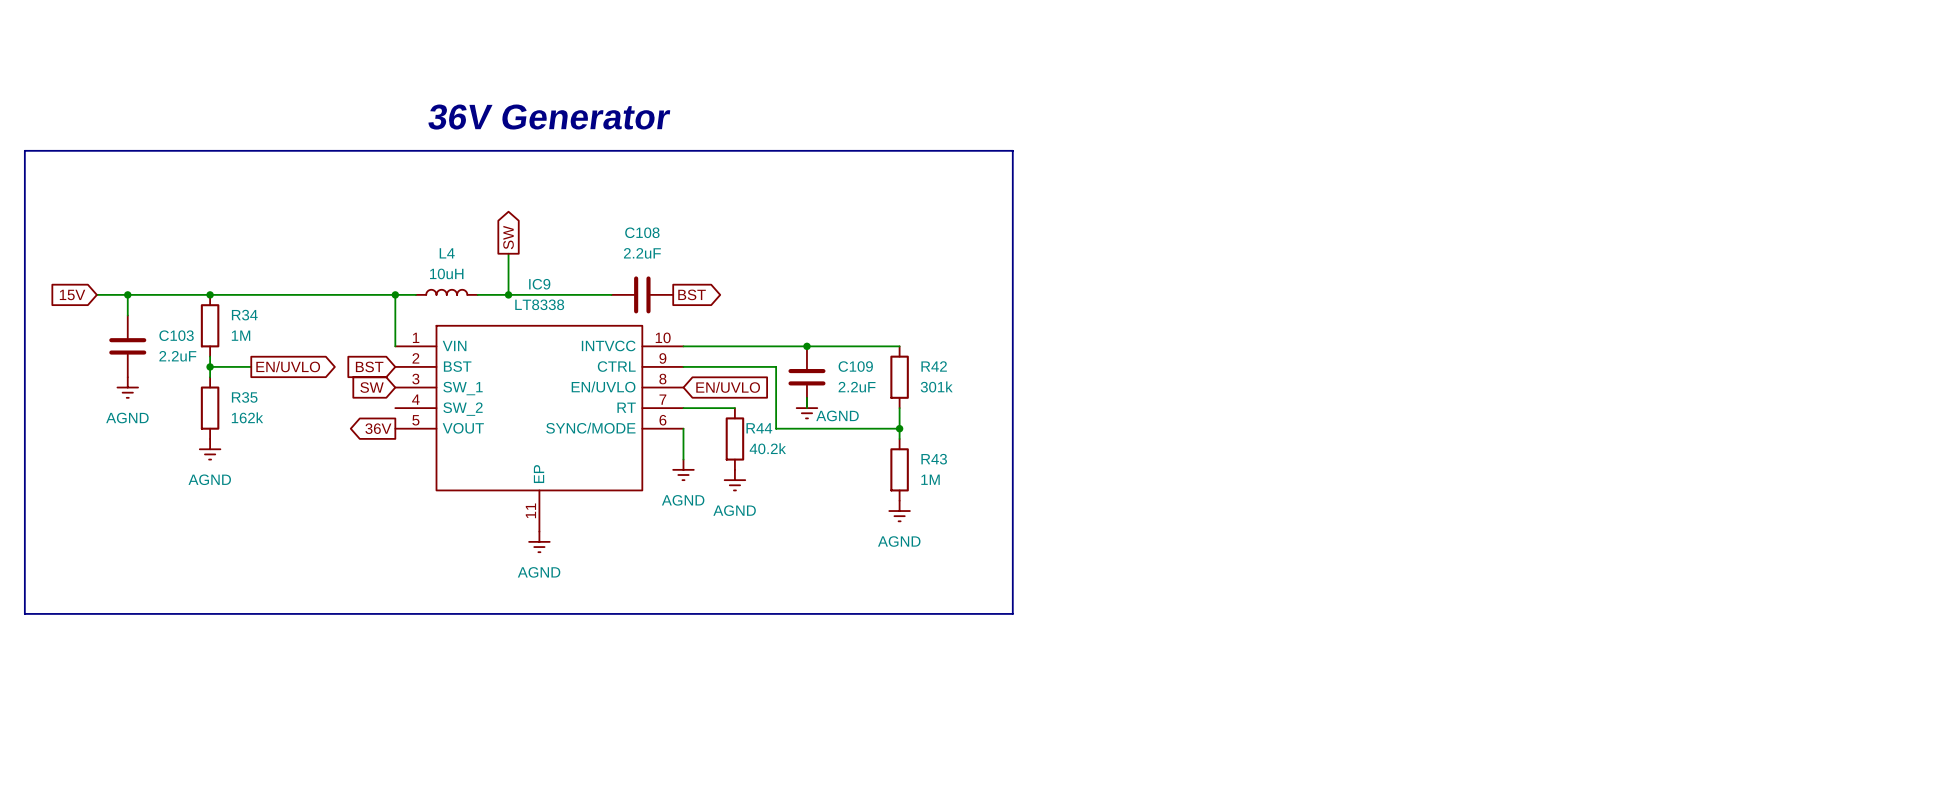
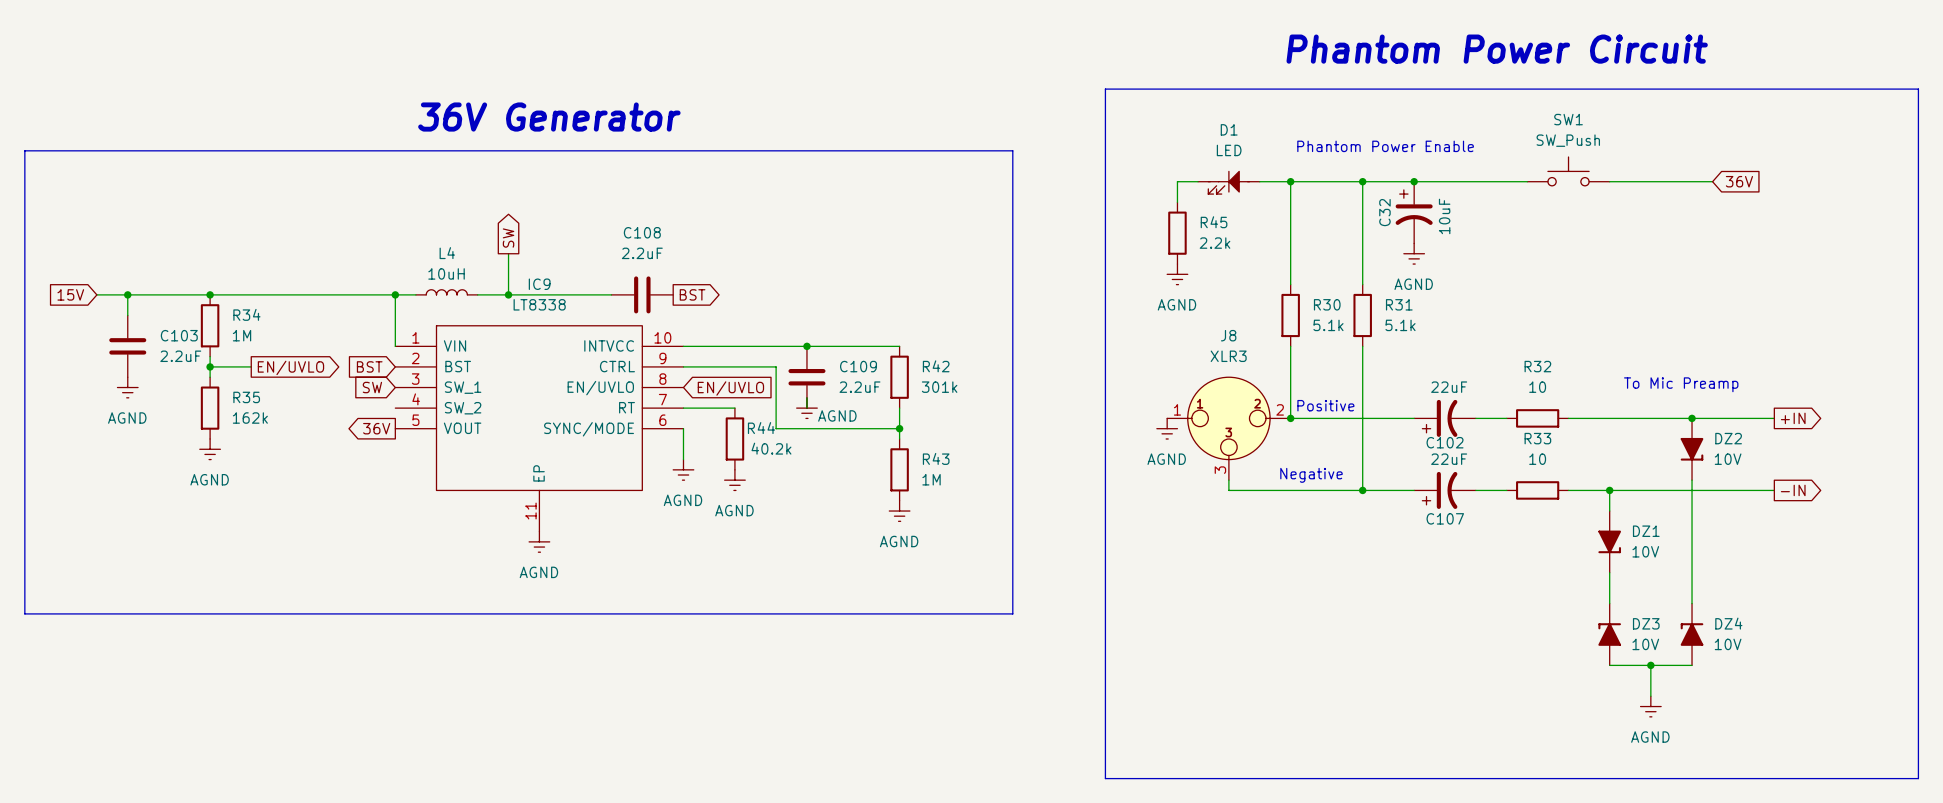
text: none -> Phantom Power Circuit (1497, 49)
line: none -> (1105, 89) (1918, 89) (1918, 778) (1105, 778) (1105, 89)
text: none -> Phantom Power Enable (1385, 146)
SW1: none -> SW_Push (1568, 171)
wire: none -> (1198, 181) (1177, 181) (1177, 202)
wire: none -> (1259, 181) (1527, 181)
wire: none -> (1290, 181) (1290, 284)
junction: none -> (1290, 181)
wire: none -> (1362, 181) (1362, 284)
junction: none -> (1362, 181)
junction: none -> (1414, 181)
wire: none -> (1609, 181) (1712, 181)
global label: none -> 36V (1739, 181)
D1: none -> LED (1228, 182)
C32: none -> 10uF (1414, 212)
R45: none -> 2.2k (1177, 233)
power symbol: none -> AGND (1414, 253)
power symbol: none -> AGND (1177, 274)
R30: none -> 5.1k (1290, 315)
R31: none -> 5.1k (1362, 315)
wire: none -> (1290, 346) (1290, 418) (1414, 418)
wire: none -> (1362, 346) (1362, 490)
text: none -> To Mic Preamp (1681, 384)
text: none -> Positive (1325, 405)
junction: none -> (1290, 418)
C102: none -> 22uF (1445, 418)
wire: none -> (1475, 418) (1506, 418)
R32: none -> 10 (1537, 418)
wire: none -> (1568, 418) (1774, 418)
junction: none -> (1692, 418)
global label: none -> +IN (1793, 418)
power symbol: none -> AGND (1167, 428)
J8: none -> XLR3 (1228, 428)
DZ2: none -> 10V (1692, 449)
text: none -> Negative (1311, 475)
wire: none -> (1228, 480) (1228, 490) (1414, 490)
wire: none -> (1692, 480) (1692, 603)
junction: none -> (1362, 490)
C107: none -> 22uF (1445, 490)
wire: none -> (1475, 490) (1506, 490)
R33: none -> 10 (1537, 490)
wire: none -> (1568, 490) (1774, 490)
wire: none -> (1609, 490) (1609, 511)
junction: none -> (1609, 490)
global label: none -> -IN (1793, 490)
DZ1: none -> 10V (1609, 541)
wire: none -> (1609, 572) (1609, 603)
DZ3: none -> 10V (1609, 634)
DZ4: none -> 10V (1692, 634)
wire: none -> (1609, 665) (1692, 665)
wire: none -> (1650, 665) (1650, 696)
junction: none -> (1650, 665)
power symbol: none -> AGND (1650, 706)

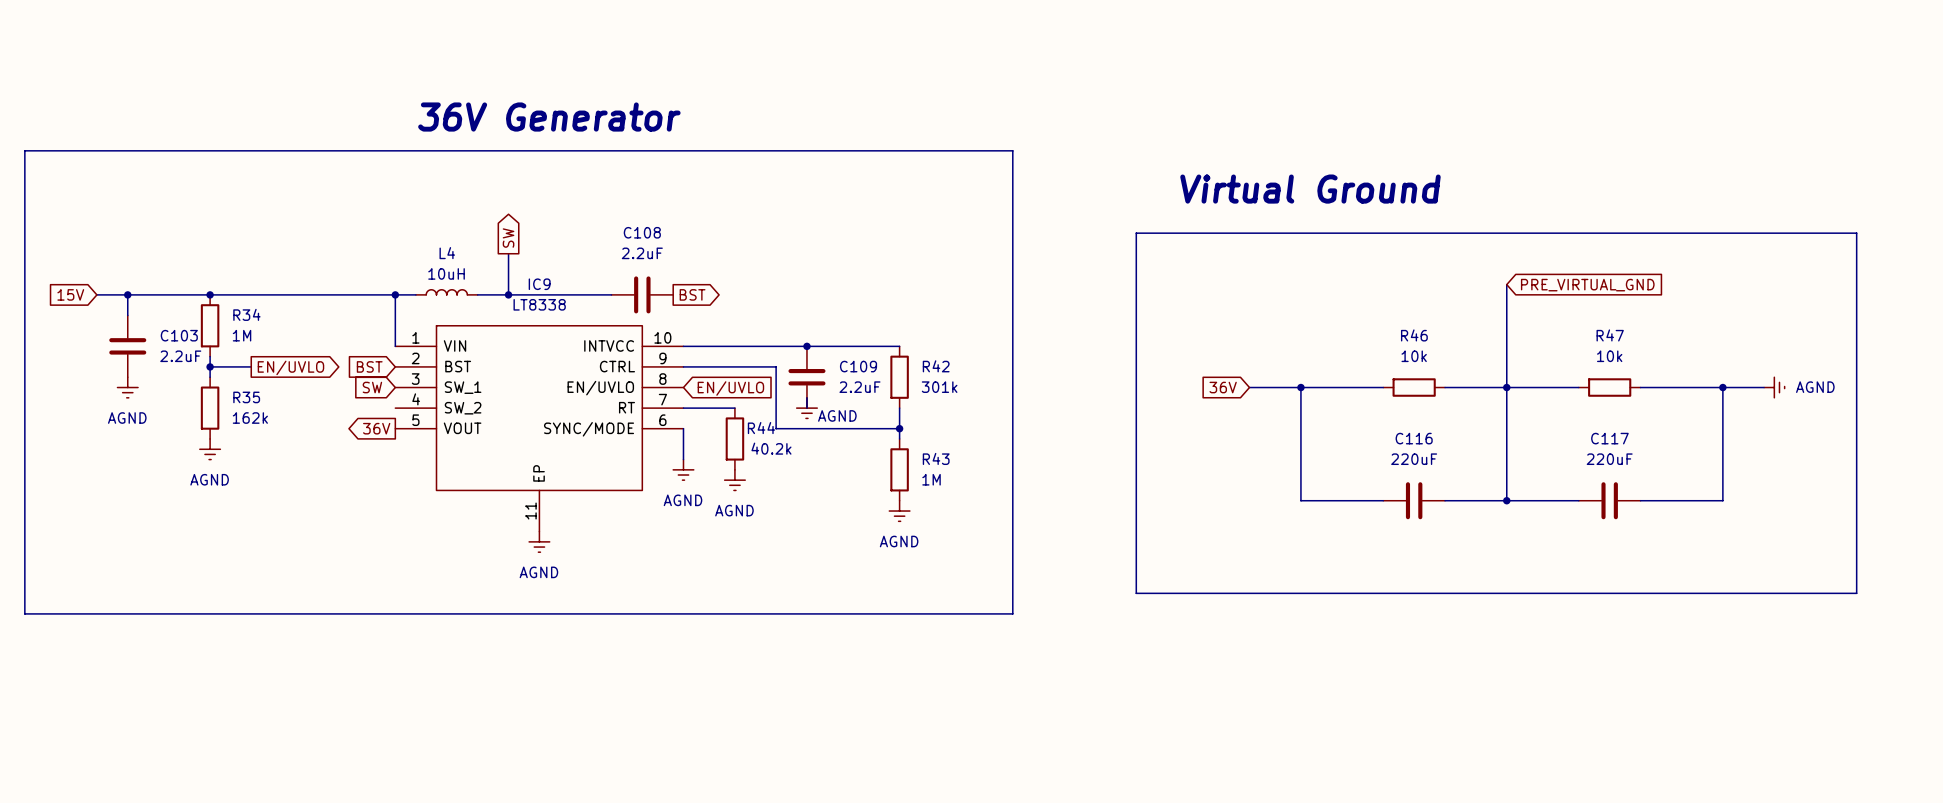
text: Phantom Power Circuit (1497, 49) -> none
line: (1105, 89) (1918, 89) (1918, 778) (1105, 778) (1105, 89) -> none
text: Phantom Power Enable (1385, 146) -> none
SW1: SW_Push (1568, 171) -> none
wire: (1198, 181) (1177, 181) (1177, 202) -> none
wire: (1259, 181) (1527, 181) -> none
wire: (1290, 181) (1290, 284) -> none
junction: (1290, 181) -> none
wire: (1362, 181) (1362, 284) -> none
junction: (1362, 181) -> none
junction: (1414, 181) -> none
wire: (1609, 181) (1712, 181) -> none
global label: 36V (1739, 181) -> none
D1: LED (1228, 182) -> none
text: none -> Virtual Ground (1310, 189)
C32: 10uF (1414, 212) -> none
line: none -> (1136, 233) (1856, 233) (1856, 593) (1136, 593) (1136, 233)
R45: 2.2k (1177, 233) -> none
power symbol: AGND (1414, 253) -> none
power symbol: AGND (1177, 274) -> none
wire: none -> (1506, 284) (1506, 500)
global label: none -> PRE_VIRTUAL_GND (1587, 285)
R30: 5.1k (1290, 315) -> none
R31: 5.1k (1362, 315) -> none
wire: (1290, 346) (1290, 418) (1414, 418) -> none
wire: (1362, 346) (1362, 490) -> none
text: To Mic Preamp (1681, 384) -> none
global label: none -> 36V (1223, 387)
wire: none -> (1249, 387) (1383, 387)
wire: none -> (1300, 387) (1300, 500) (1383, 500)
R46: none -> 10k (1414, 387)
wire: none -> (1445, 387) (1578, 387)
junction: none -> (1506, 387)
R47: none -> 10k (1609, 387)
wire: none -> (1640, 387) (1764, 387)
wire: none -> (1722, 387) (1722, 500) (1640, 500)
power symbol: none -> AGND (1774, 387)
text: Positive (1325, 405) -> none
junction position: (1290, 418) -> (1300, 387)
C102: 22uF (1445, 418) -> none
wire: (1475, 418) (1506, 418) -> none
R32: 10 (1537, 418) -> none
wire: (1568, 418) (1774, 418) -> none
junction position: (1692, 418) -> (1722, 387)
global label: +IN (1793, 418) -> none
power symbol: AGND (1167, 428) -> none
J8: XLR3 (1228, 428) -> none
DZ2: 10V (1692, 449) -> none
text: Negative (1311, 475) -> none
wire: (1228, 480) (1228, 490) (1414, 490) -> none
wire: (1692, 480) (1692, 603) -> none
junction: (1362, 490) -> none
C107: 22uF (1445, 490) -> none
wire: (1475, 490) (1506, 490) -> none
R33: 10 (1537, 490) -> none
wire: (1568, 490) (1774, 490) -> none
wire: (1609, 490) (1609, 511) -> none
junction: (1609, 490) -> none
global label: -IN (1793, 490) -> none
C116: none -> 220uF (1414, 500)
wire: none -> (1445, 500) (1578, 500)
junction: none -> (1506, 500)
C117: none -> 220uF (1609, 500)
DZ1: 10V (1609, 541) -> none
wire: (1609, 572) (1609, 603) -> none
DZ3: 10V (1609, 634) -> none
DZ4: 10V (1692, 634) -> none
wire: (1609, 665) (1692, 665) -> none
wire: (1650, 665) (1650, 696) -> none
junction: (1650, 665) -> none
power symbol: AGND (1650, 706) -> none

